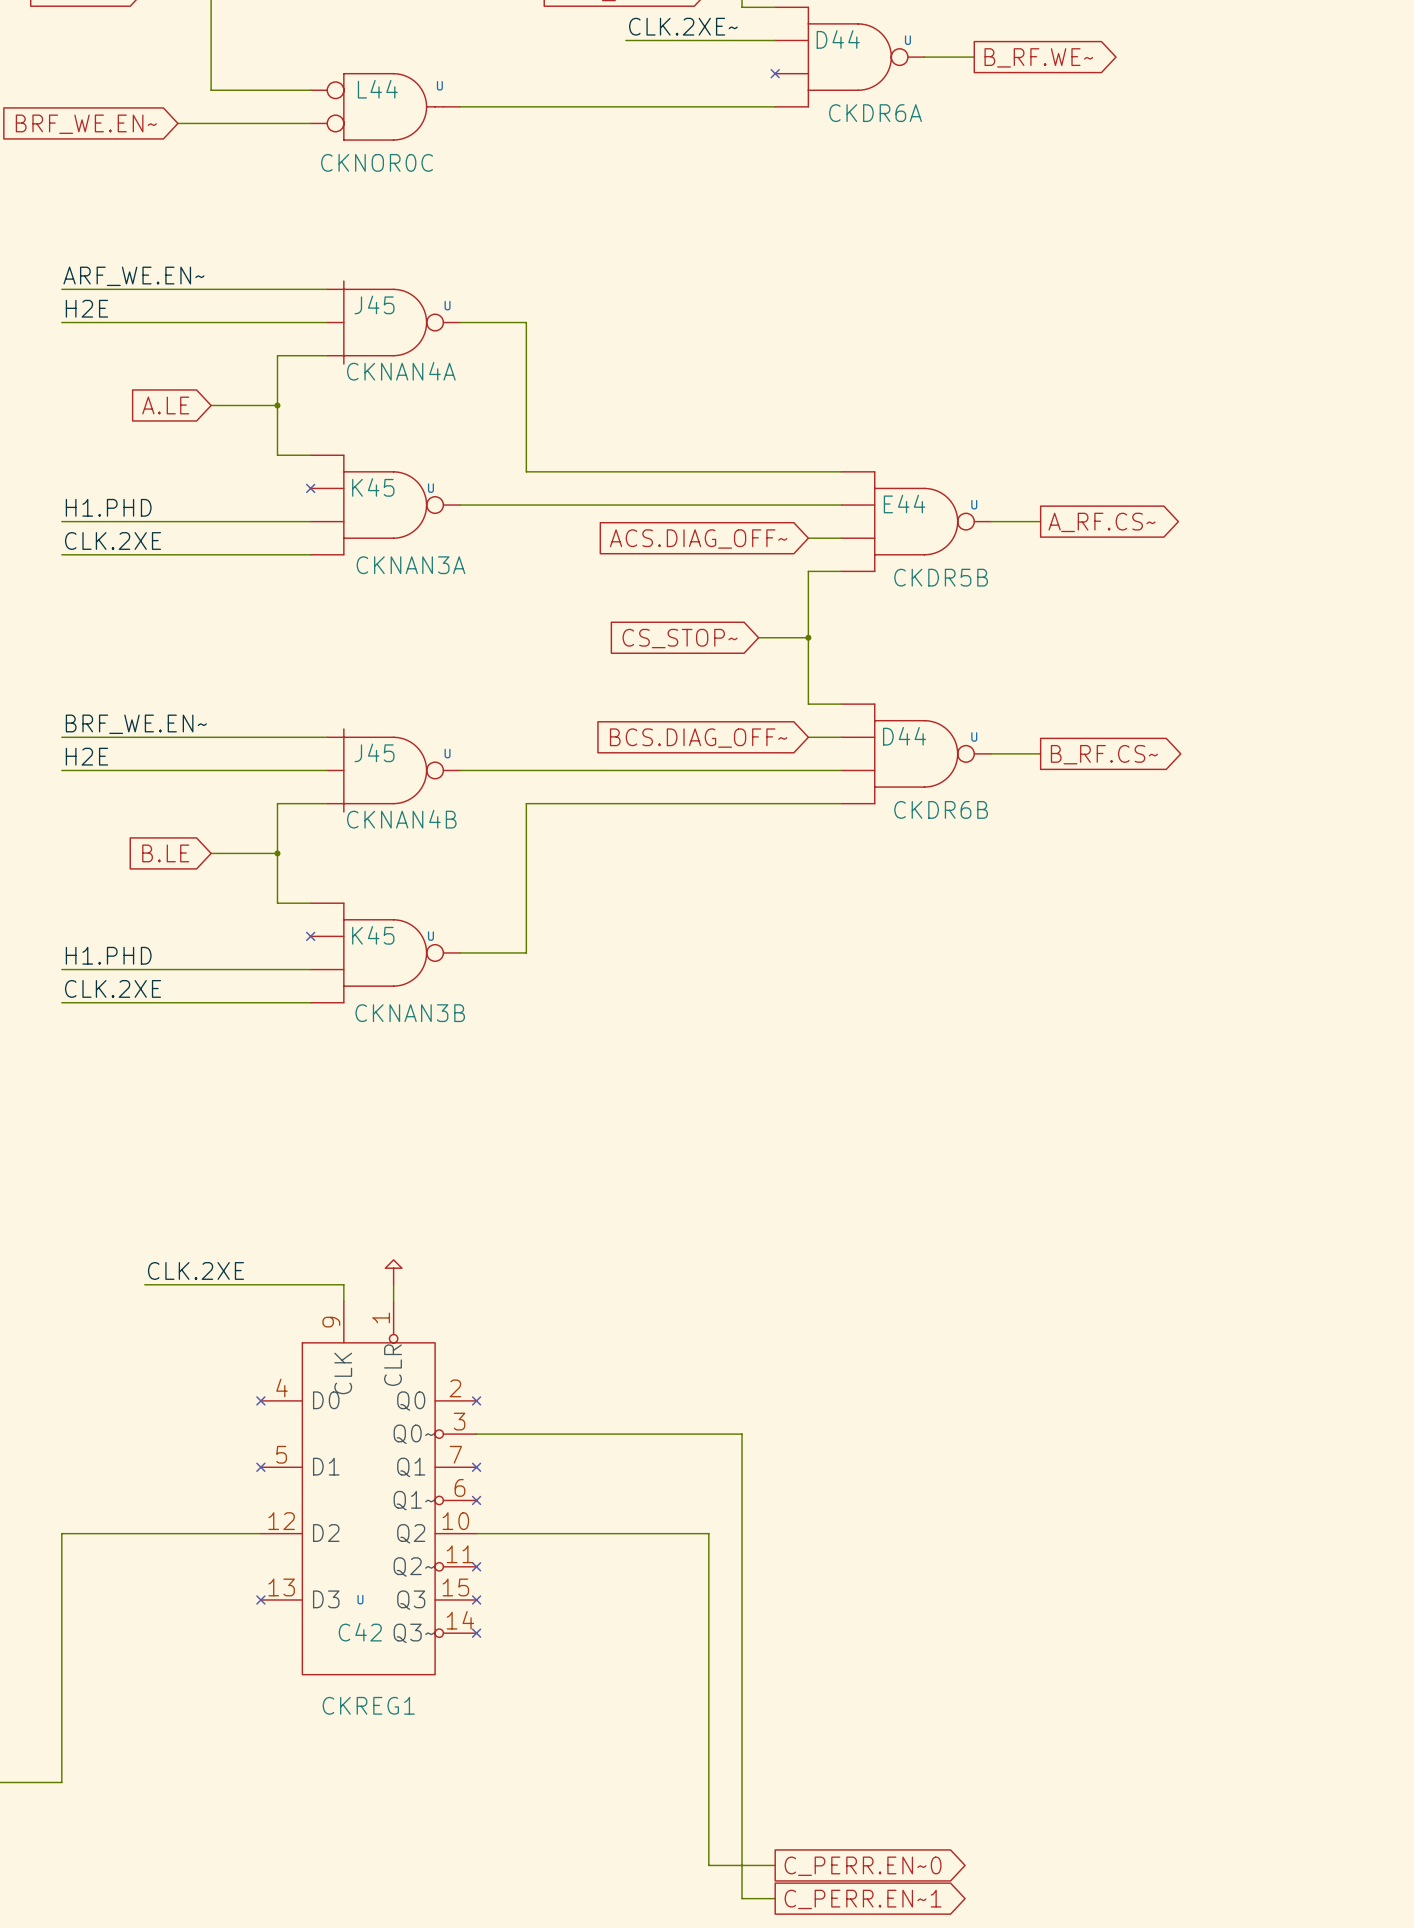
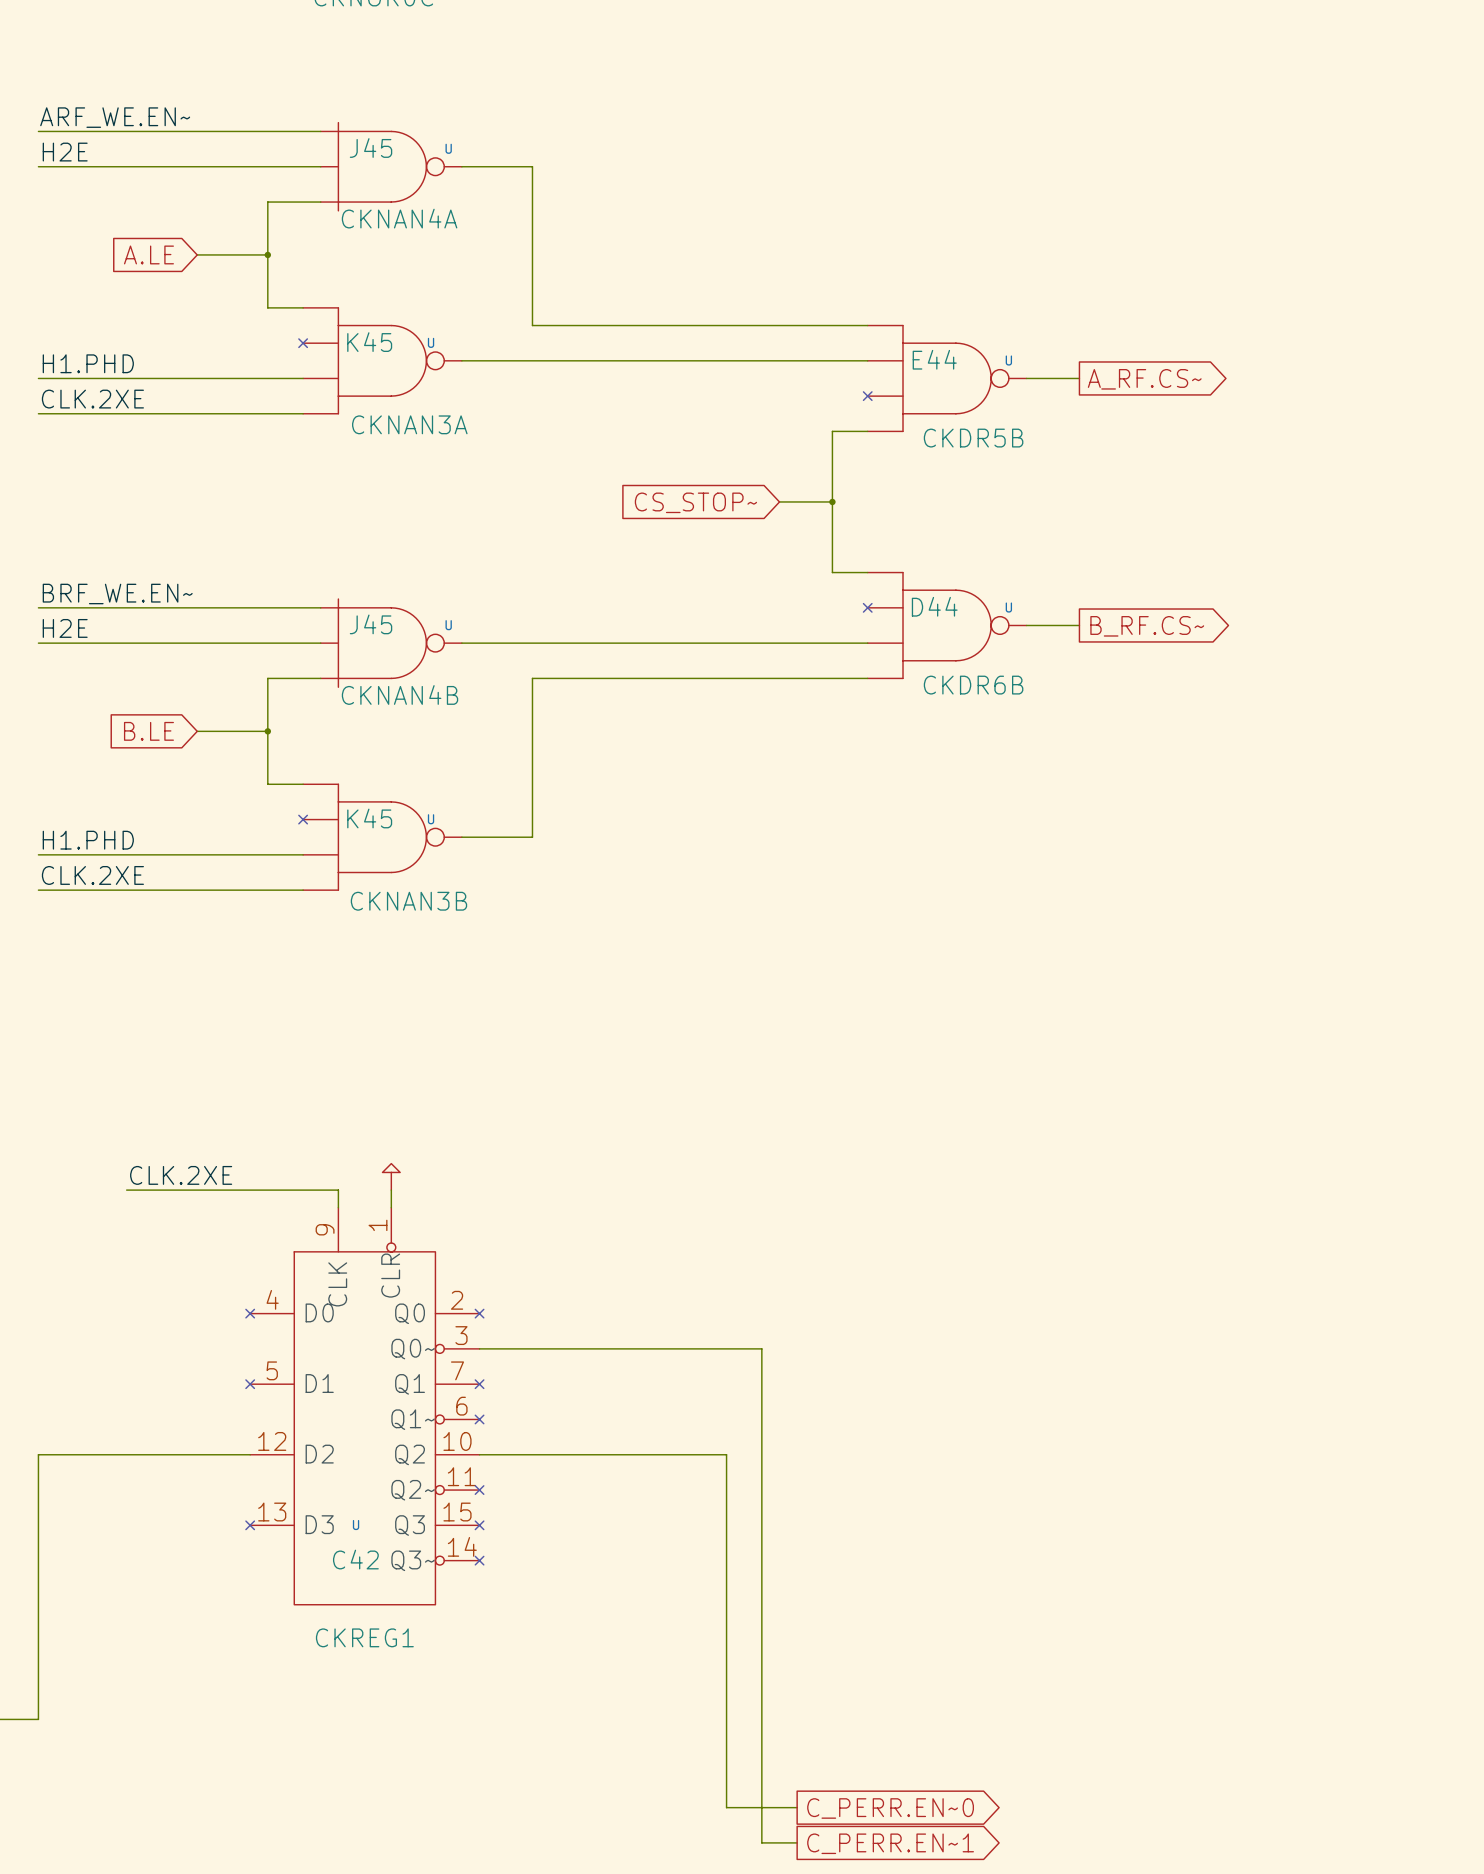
wire: (808, 538) (841, 538) -> none
no-connect mark: none -> (867, 396)
global label: ACS.DIAG_OFF~ (698, 539) -> none
wire: (808, 737) (841, 737) -> none
no-connect mark: none -> (867, 607)
global label: BCS.DIAG_OFF~ (698, 738) -> none

